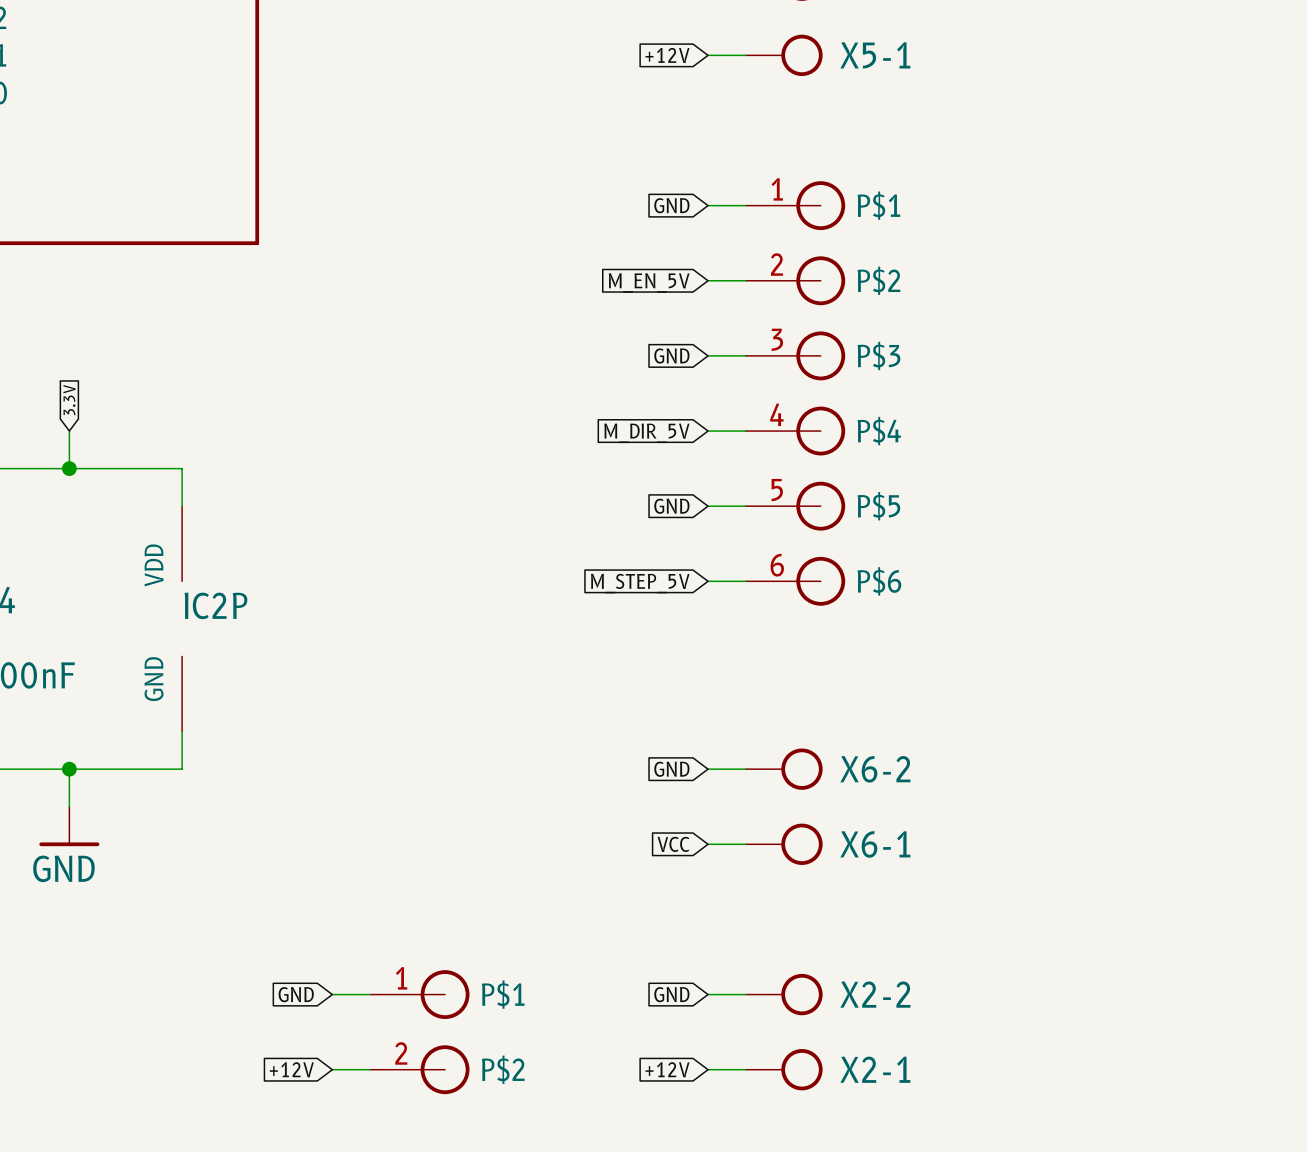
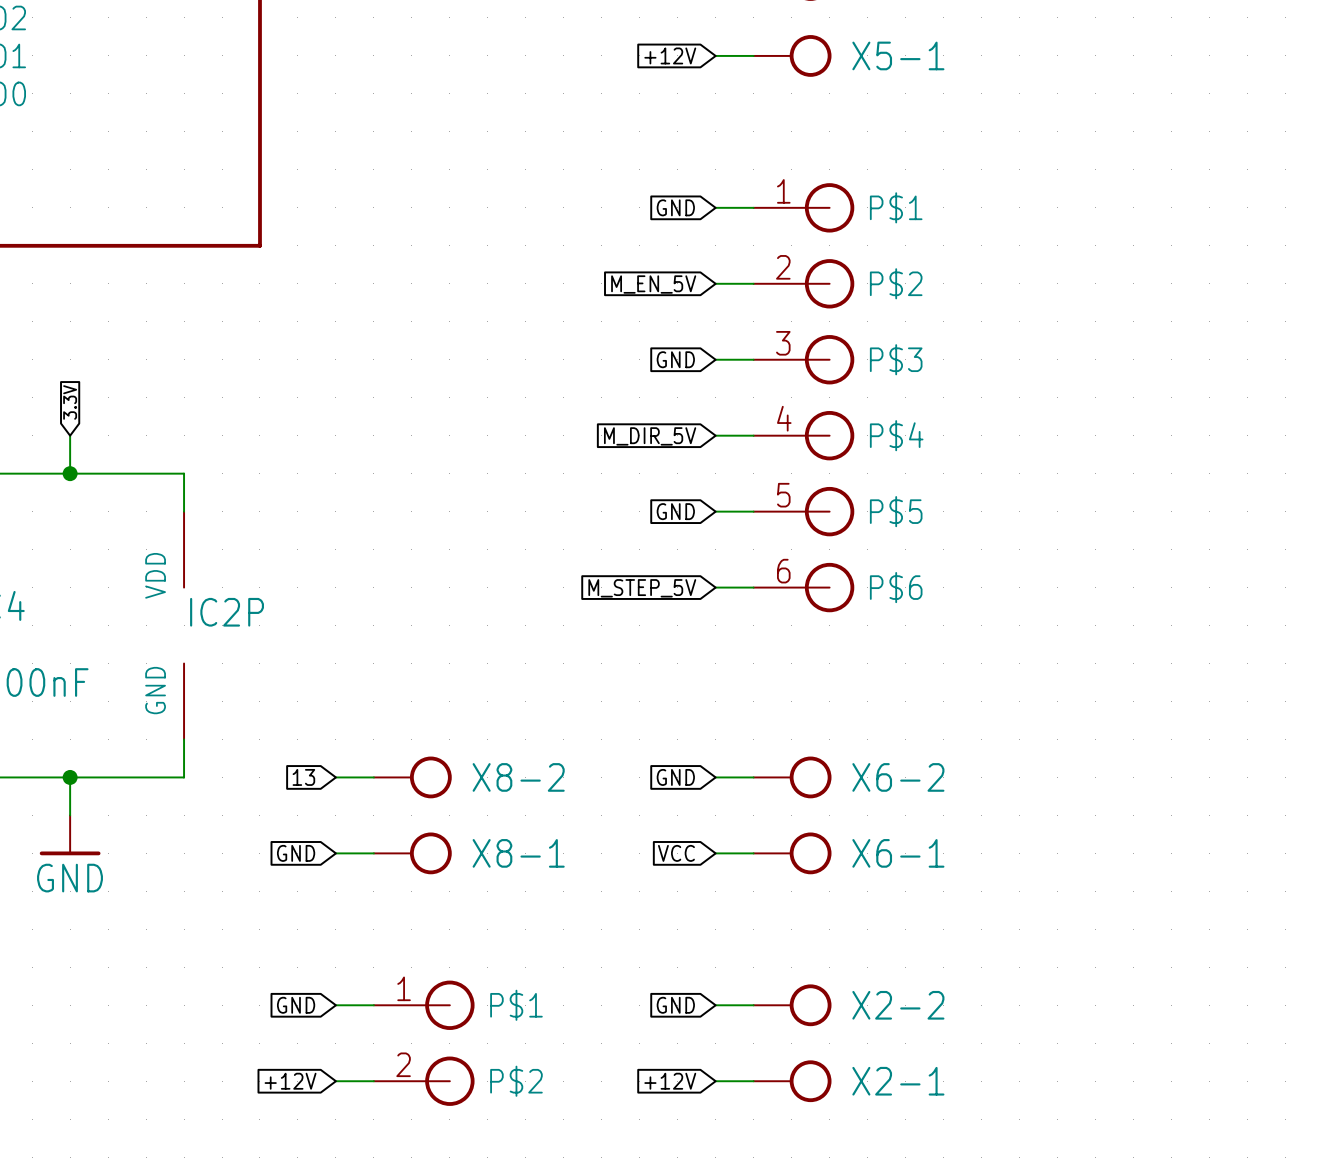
global label: none -> 13 (303, 777)
wire: none -> (335, 777) (373, 777)
X8-2: none -> (412, 777)
global label: none -> GND (296, 853)
wire: none -> (335, 853) (373, 853)
X8-1: none -> (412, 853)

